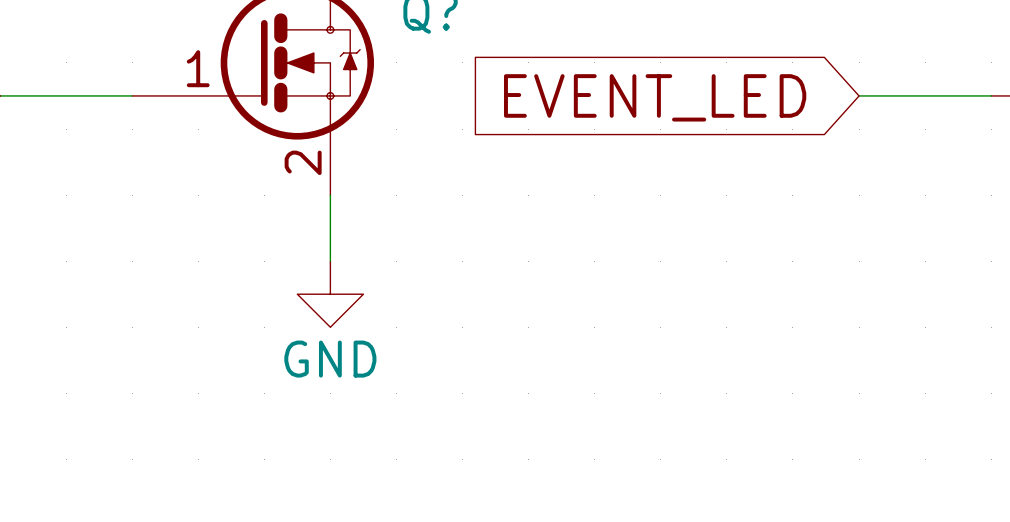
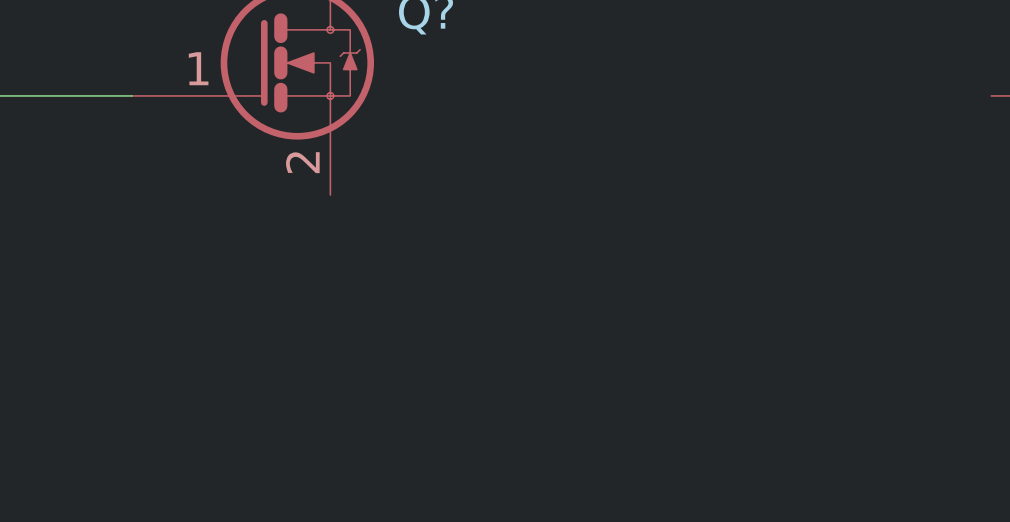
wire: (859, 95) (991, 95) -> none
global label: EVENT_LED (655, 97) -> none
wire: (330, 195) (330, 261) -> none
power symbol: GND (330, 294) -> none

